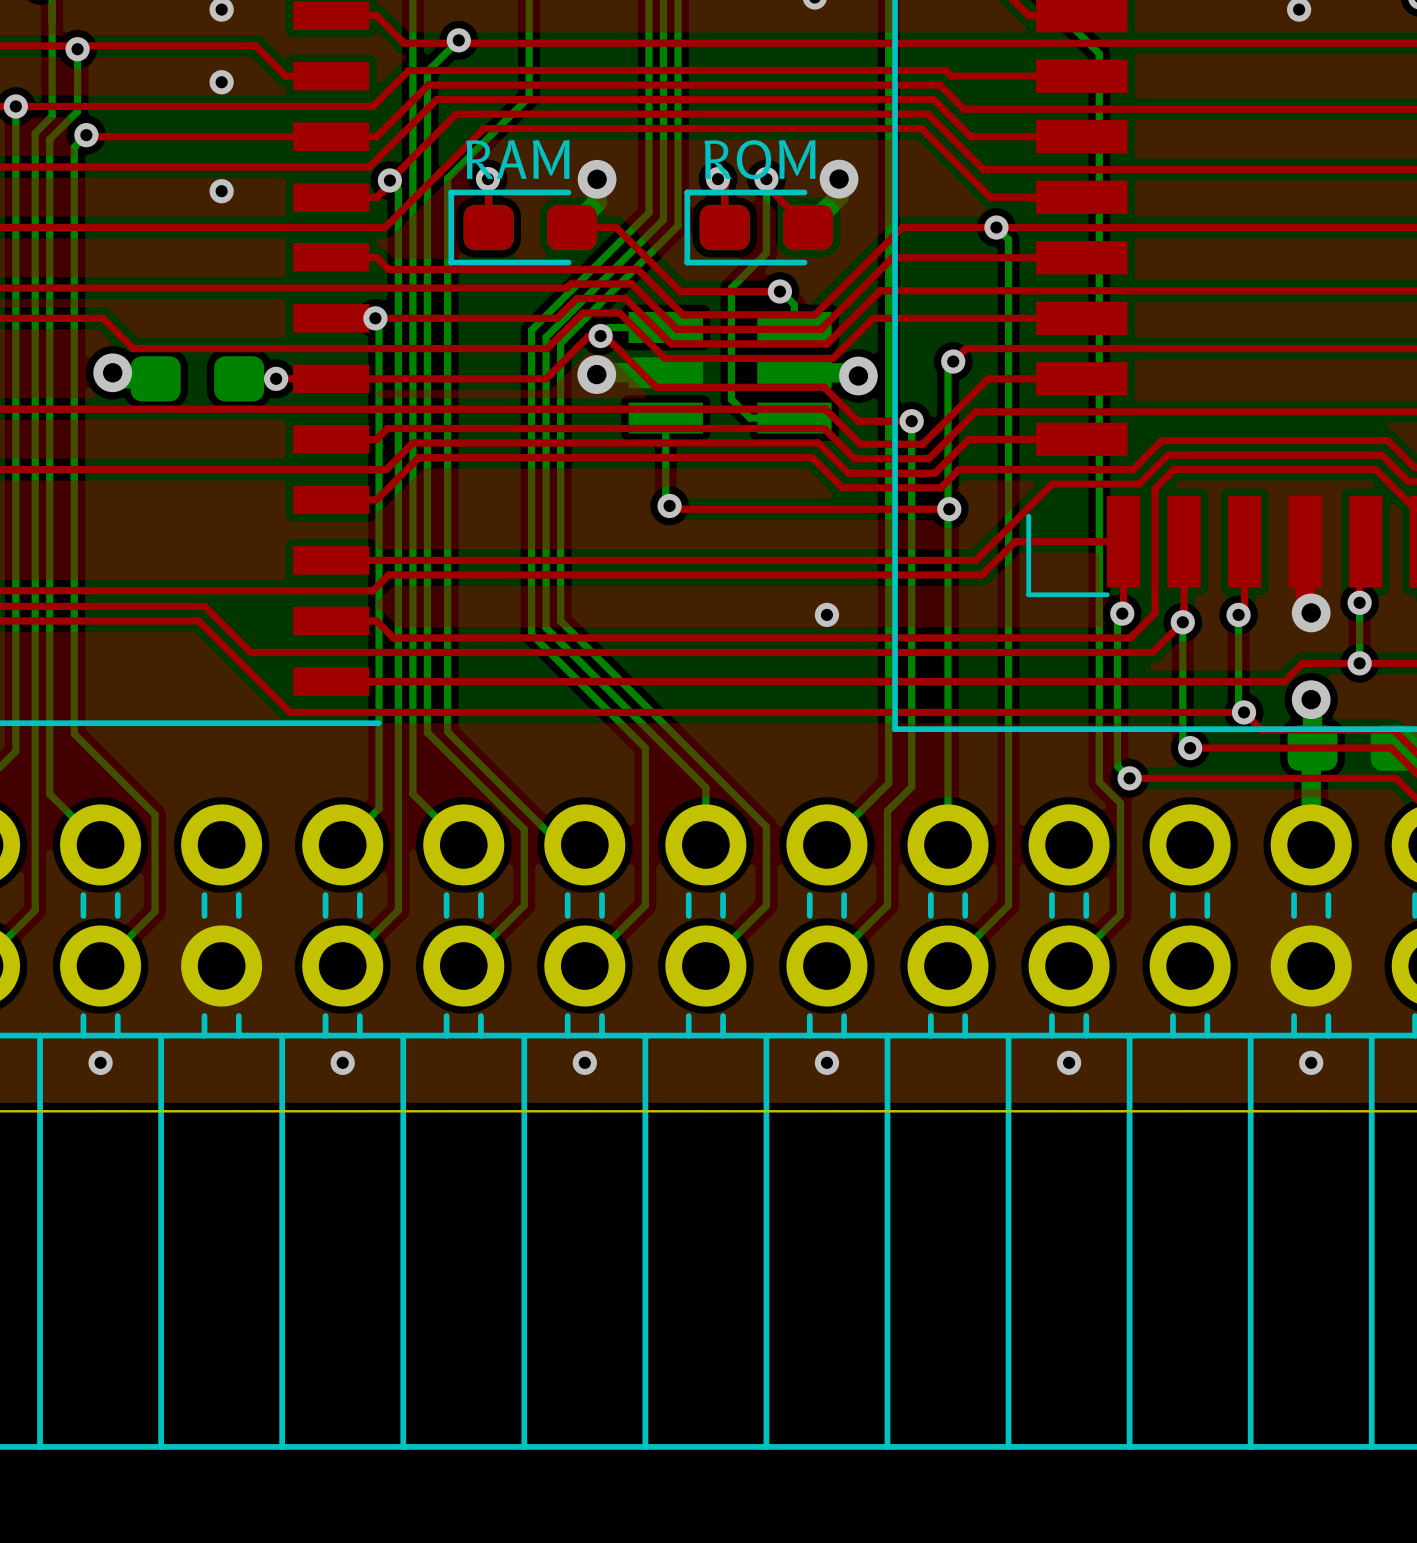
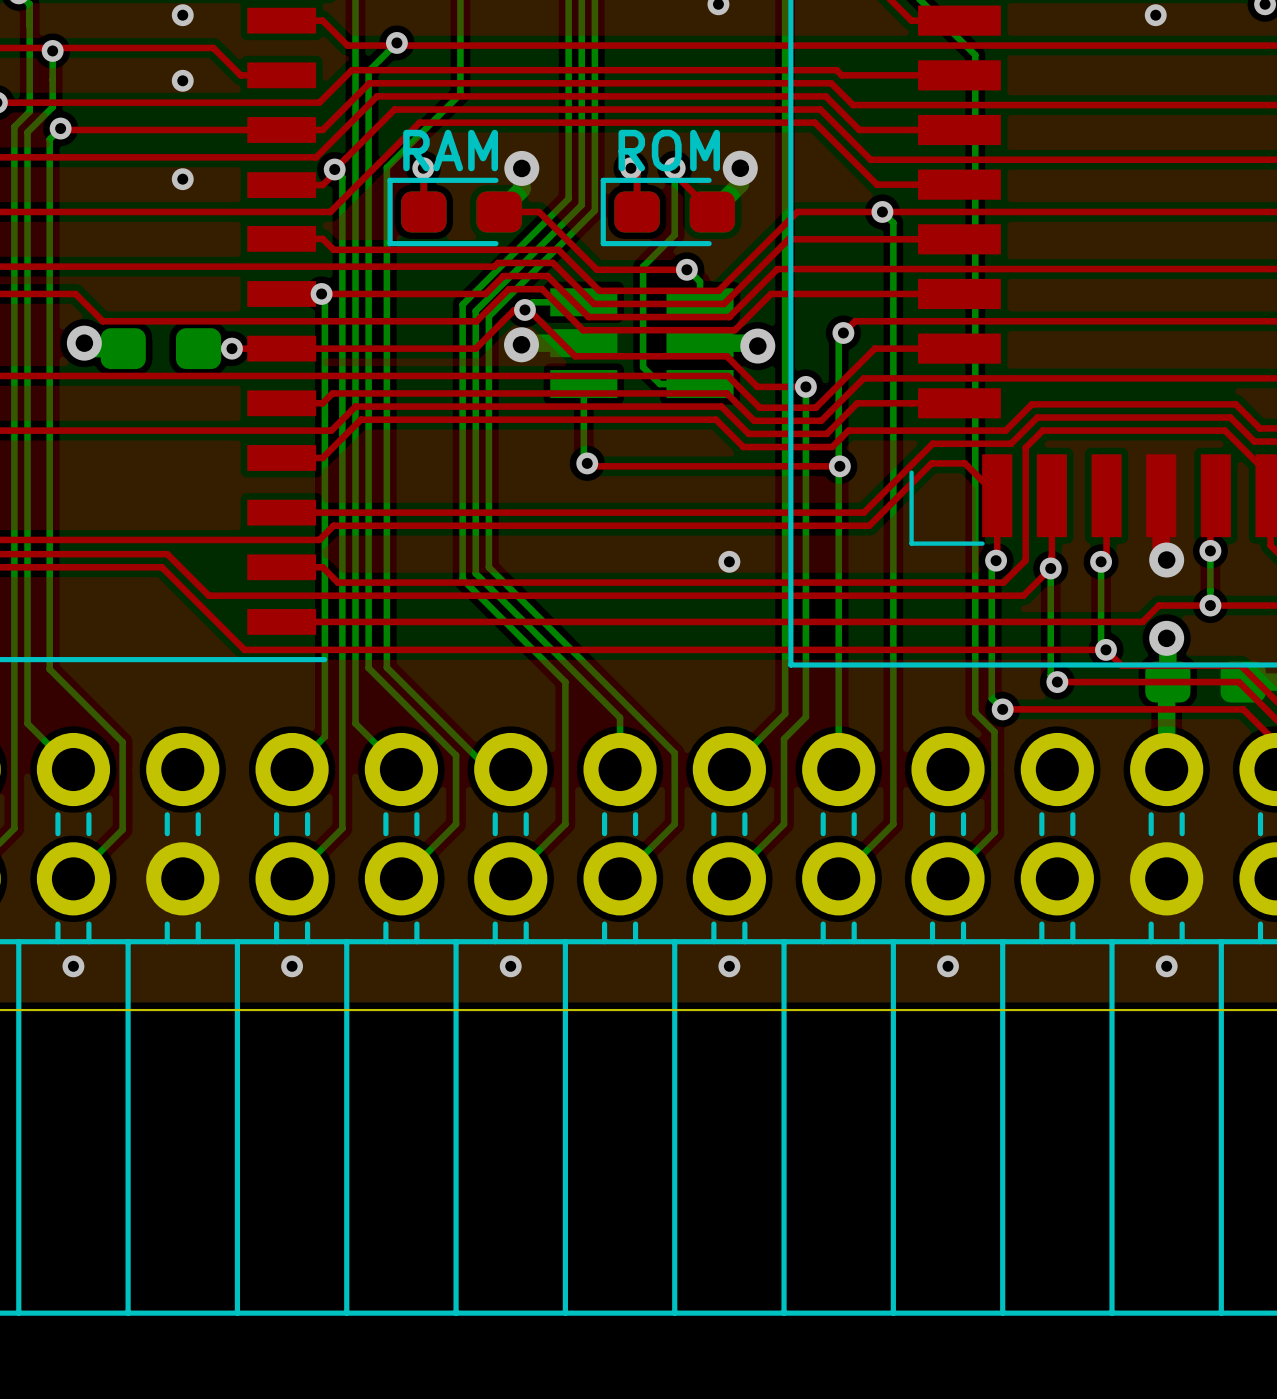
top track: (1015, 541) (1123, 541) -> (899, 495) (931, 463) (964, 463) (997, 495)

